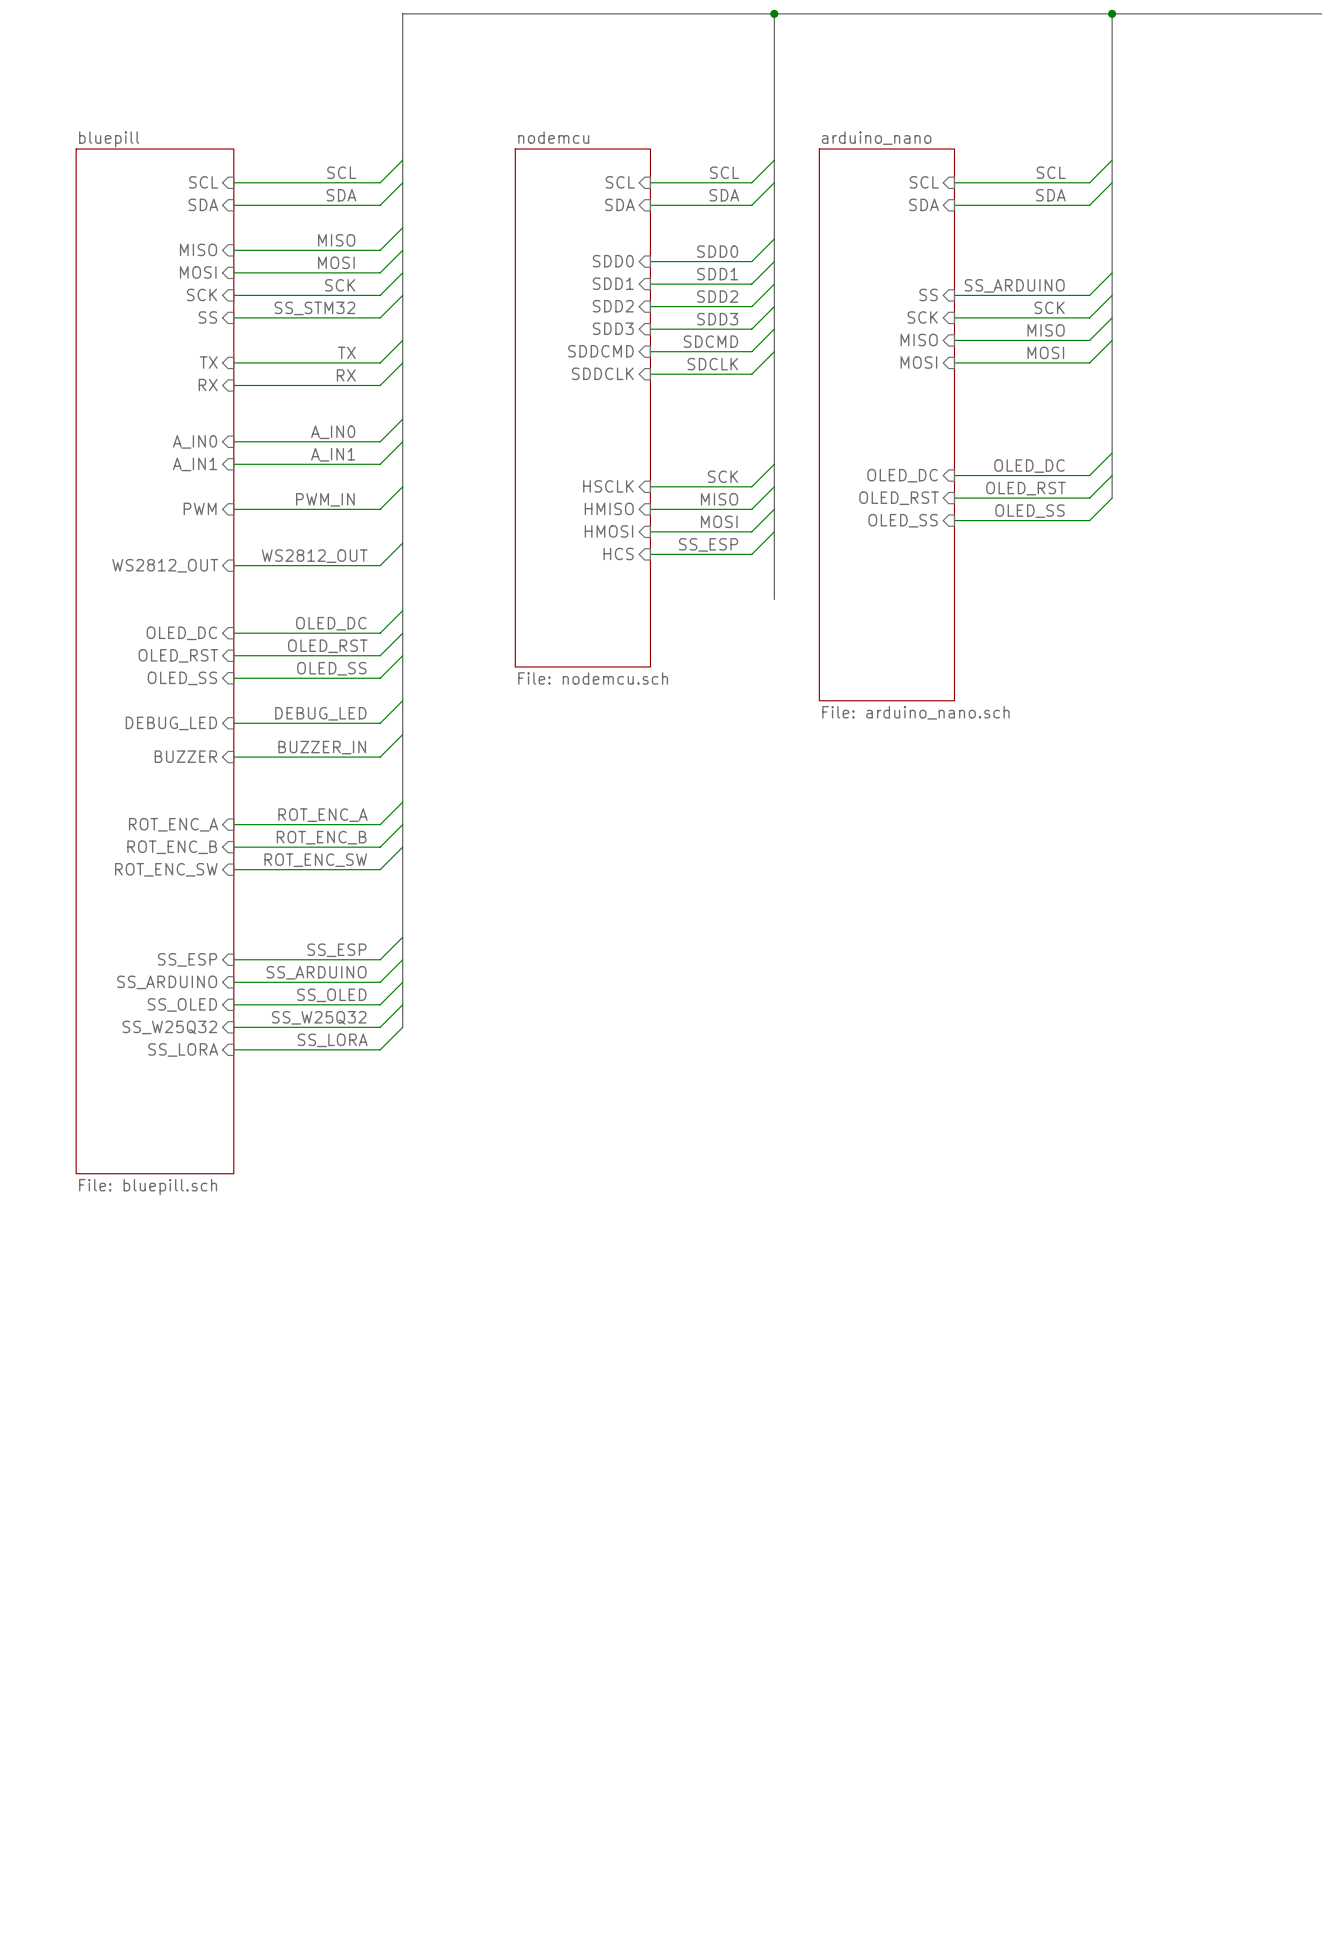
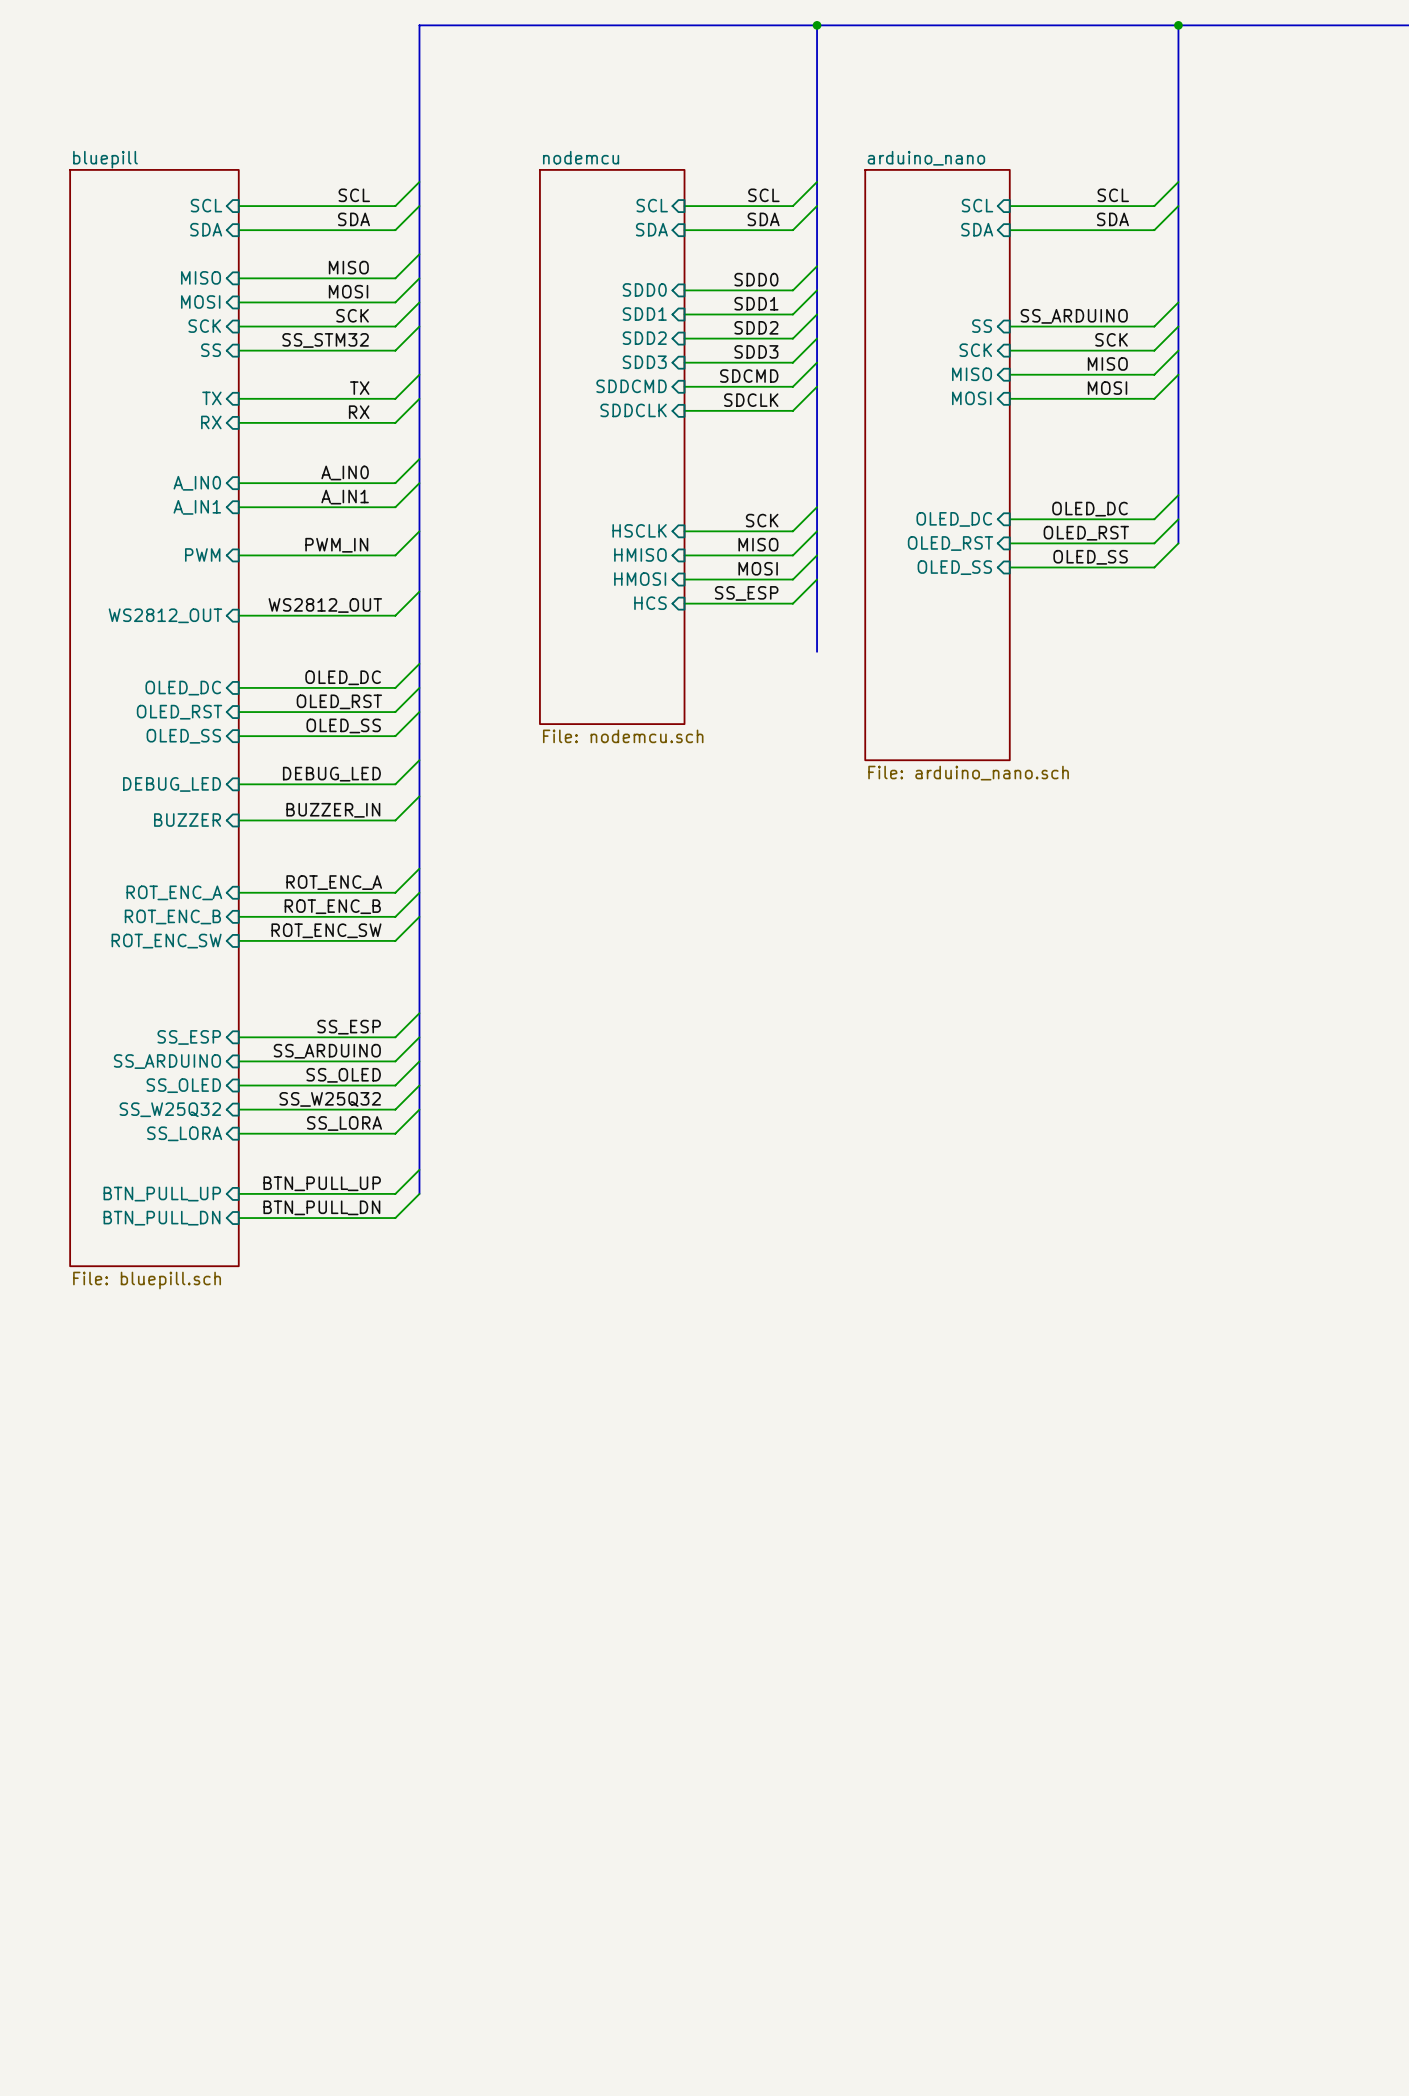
bus: none -> (419, 1109) (419, 1193)
wire: none -> (419, 1169) (395, 1193) (238, 1193)
label: none -> BTN_PULL_UP (322, 1183)
sheet pin: none -> BTN_PULL_UP (162, 1194)
wire: none -> (419, 1193) (395, 1218) (238, 1218)
label: none -> BTN_PULL_DN (321, 1207)
sheet pin: none -> BTN_PULL_DN (162, 1218)

